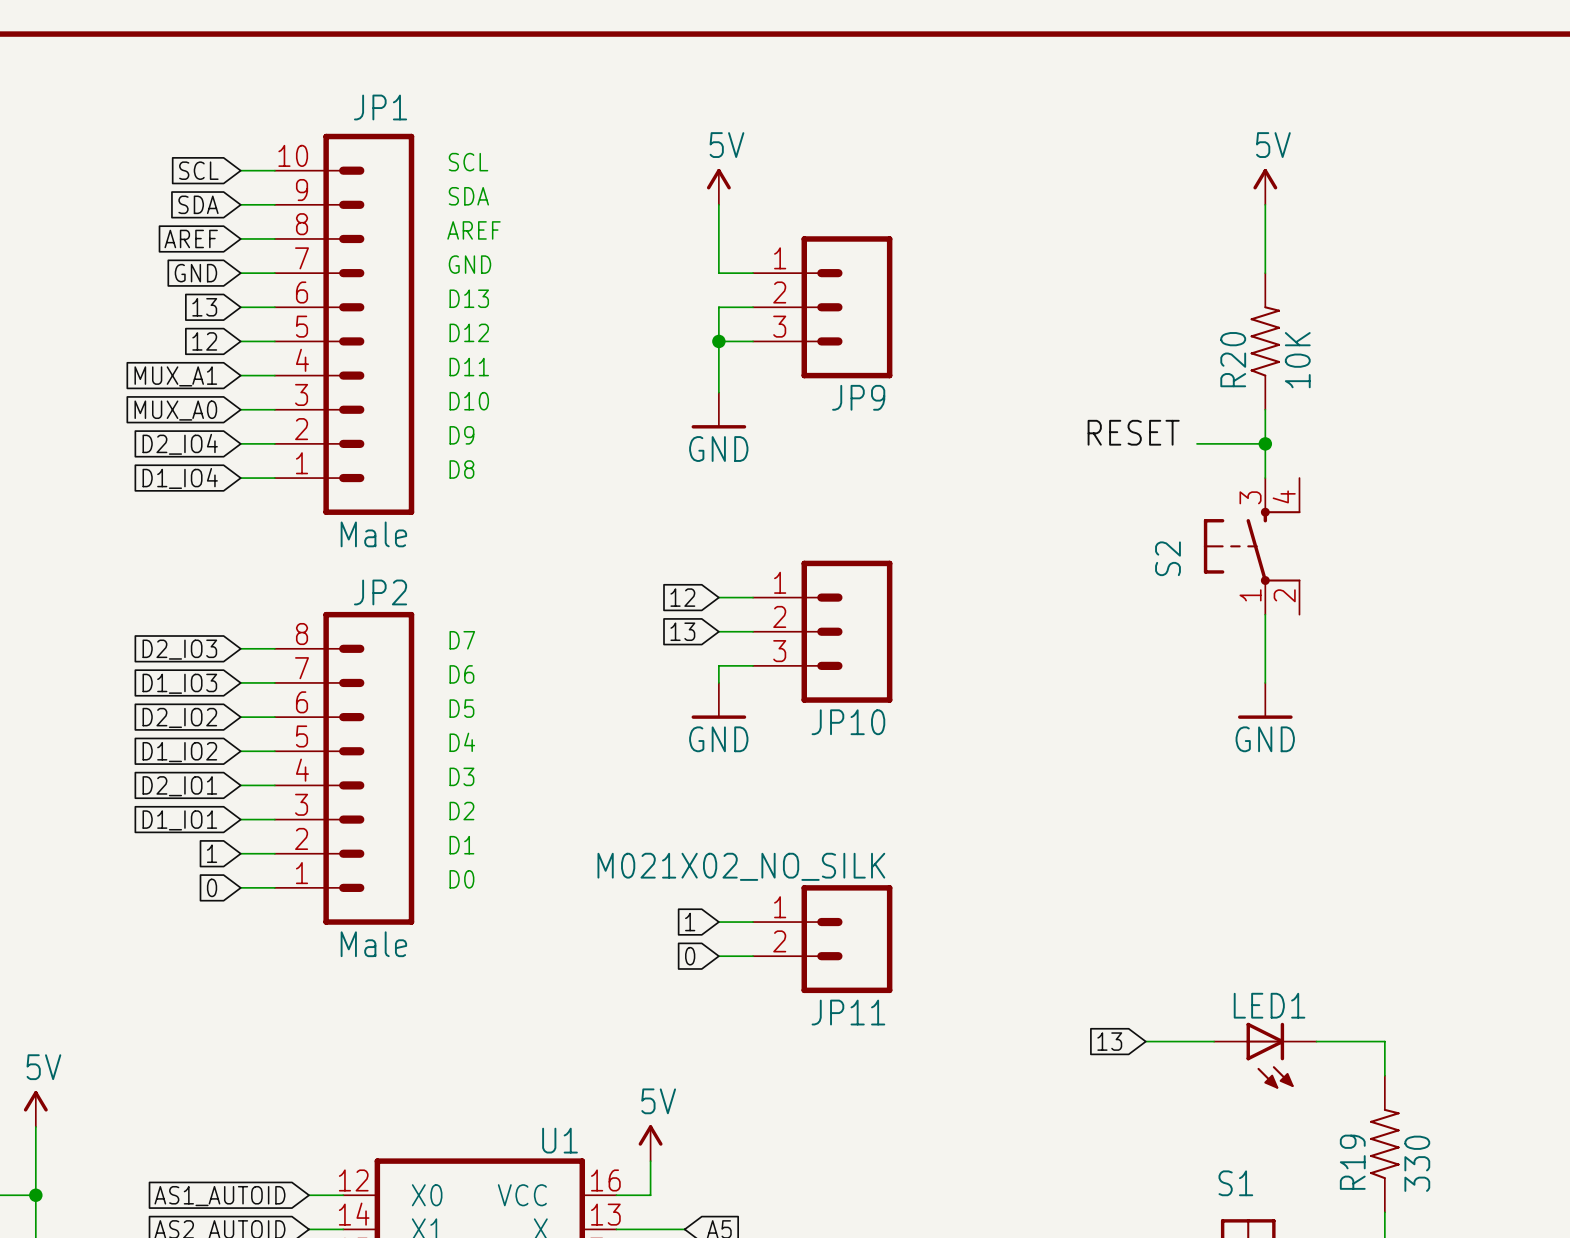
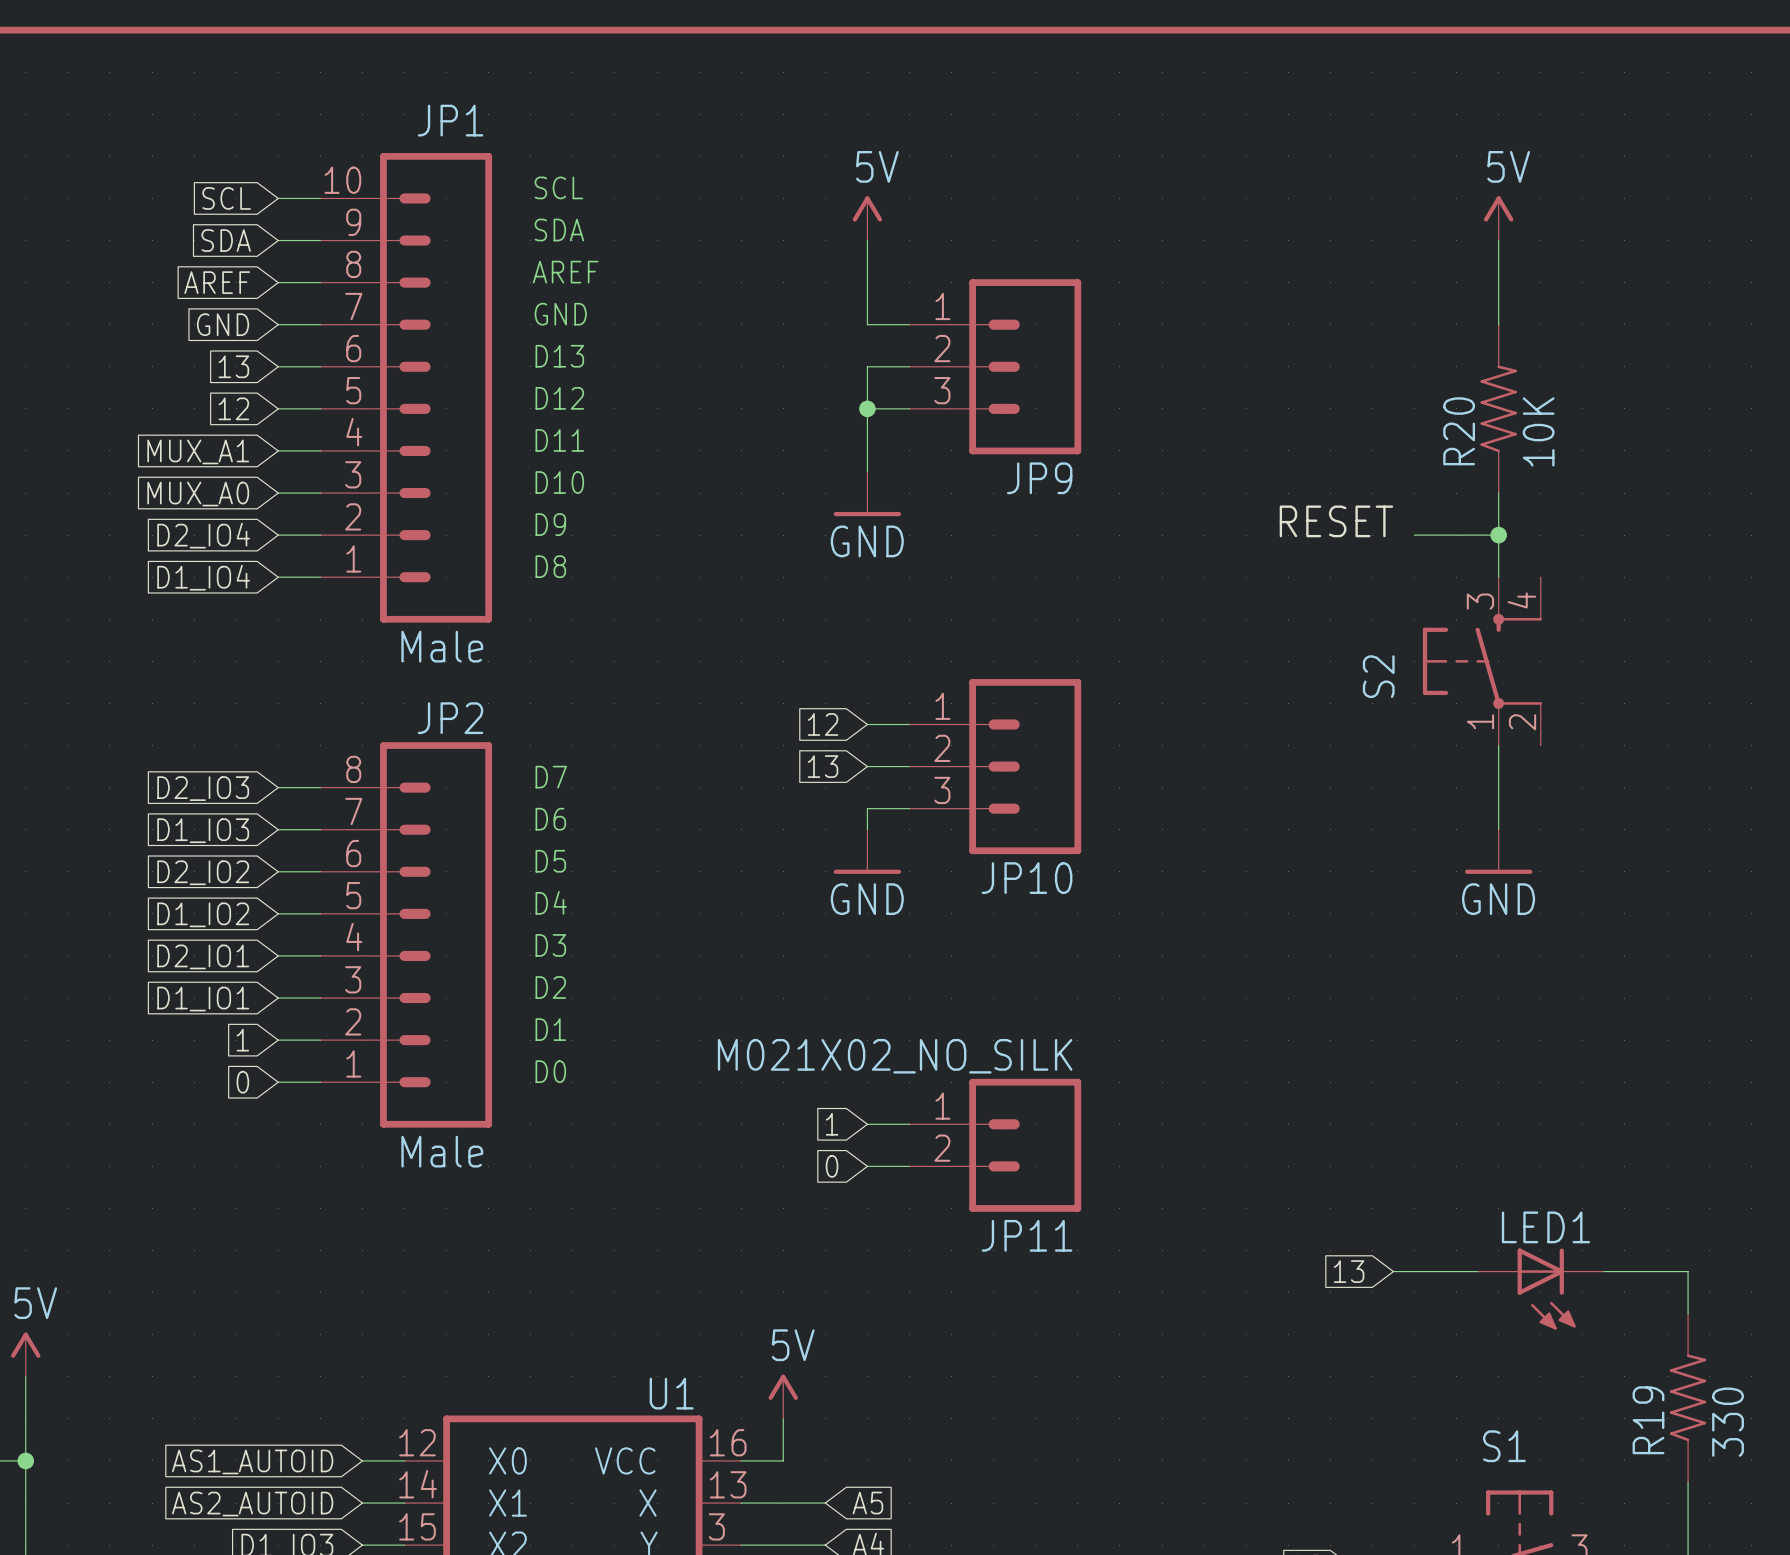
power symbol position: 5V (1265, 186) -> 5V (1498, 218)
wire: (1265, 204) (1265, 273) -> (1498, 240) (1498, 324)
R20 position: (1265, 341) -> (1498, 408)
wire: (1265, 409) (1265, 478) -> (1498, 493) (1498, 577)
label position: RESET (1133, 432) -> RESET (1336, 521)
wire: (1231, 443) (1265, 443) -> (1414, 535) (1456, 535)
junction position: (1265, 443) -> (1498, 535)
S2 position: (1252, 546) -> (1482, 661)
wire: (1265, 614) (1265, 682) -> (1498, 745) (1498, 829)
power symbol position: GND (1265, 700) -> GND (1498, 851)

